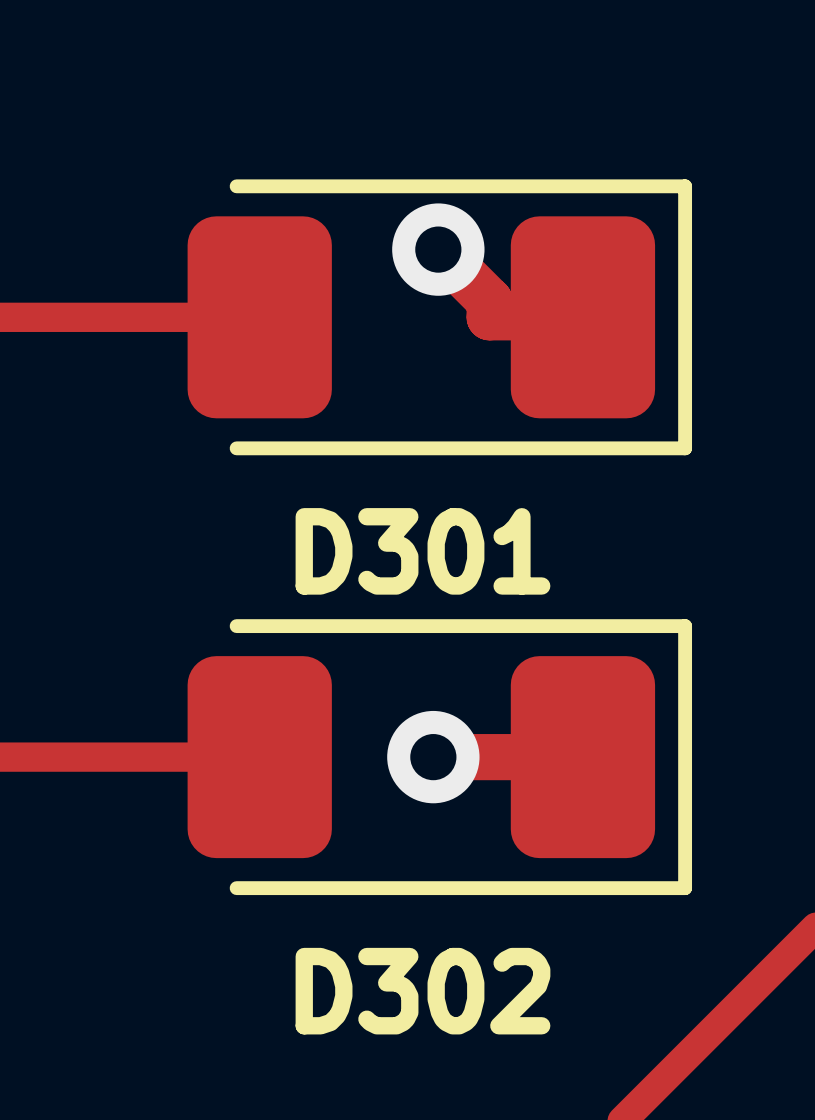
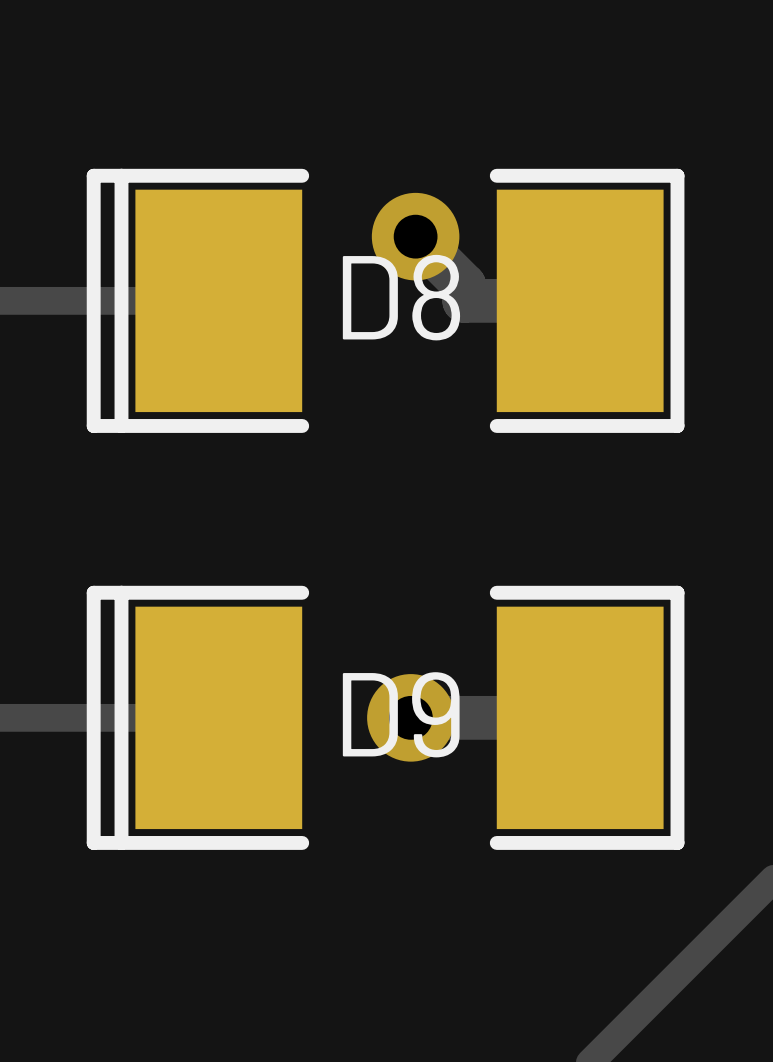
D8: none -> (385, 300)
D301: (439, 317) -> none
D9: none -> (385, 717)
D302: (439, 757) -> none

